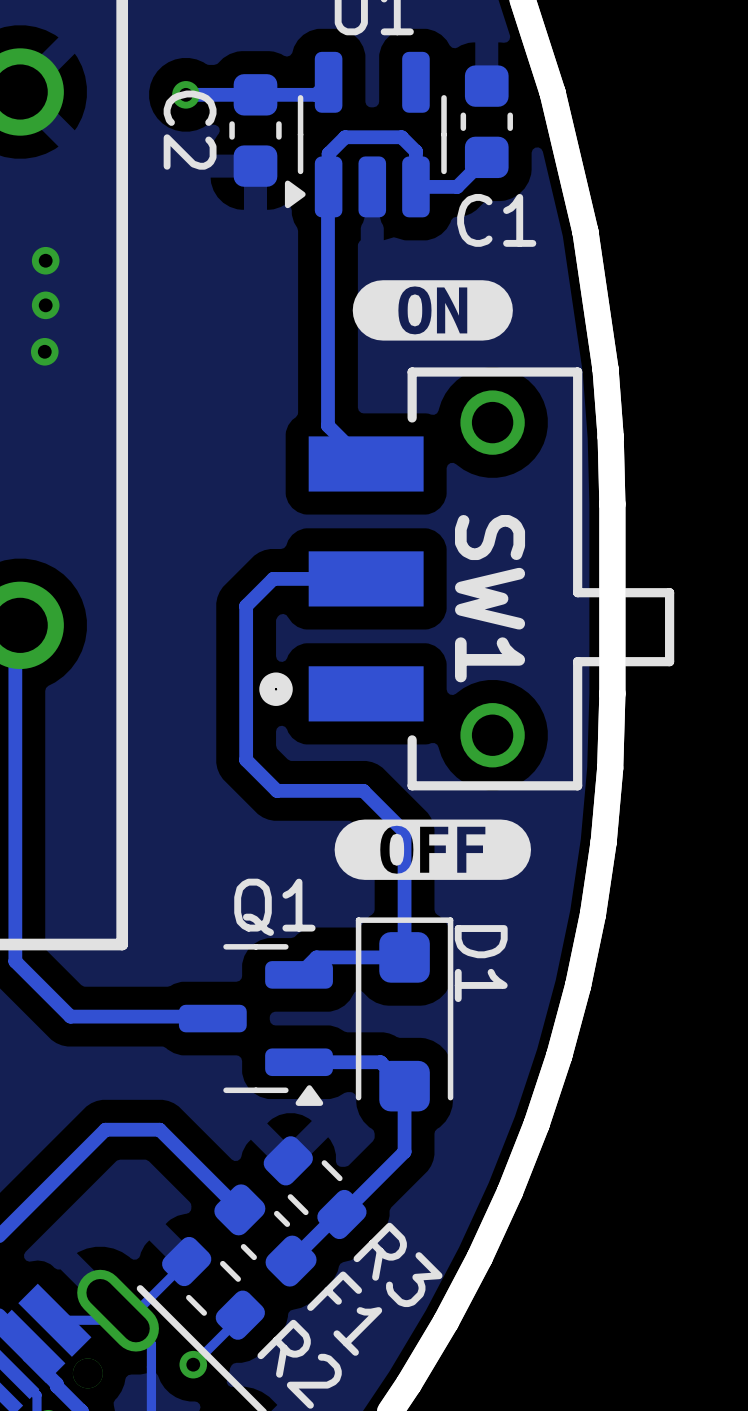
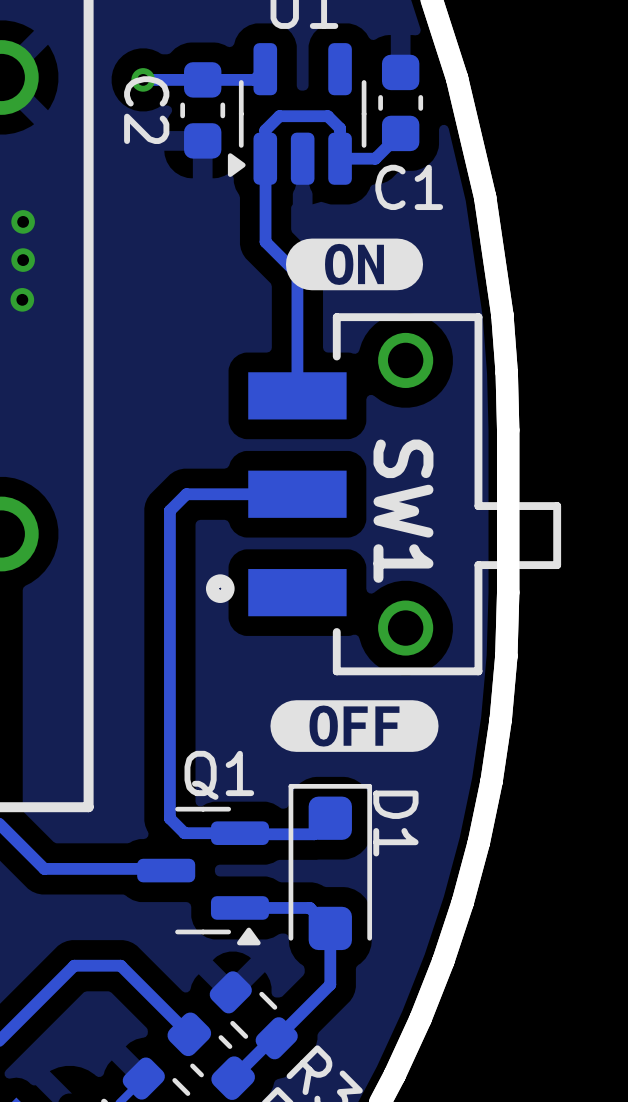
track: (327, 187) (327, 425) (366, 463) -> (265, 158) (265, 241) (297, 273) (297, 395)
track: (273, 578) (246, 606) (246, 760) (276, 790) (363, 790) (404, 832) (404, 957) (316, 957) (299, 974) -> (217, 494) (186, 494) (169, 510) (169, 818) (184, 833) (314, 834) (330, 818)

